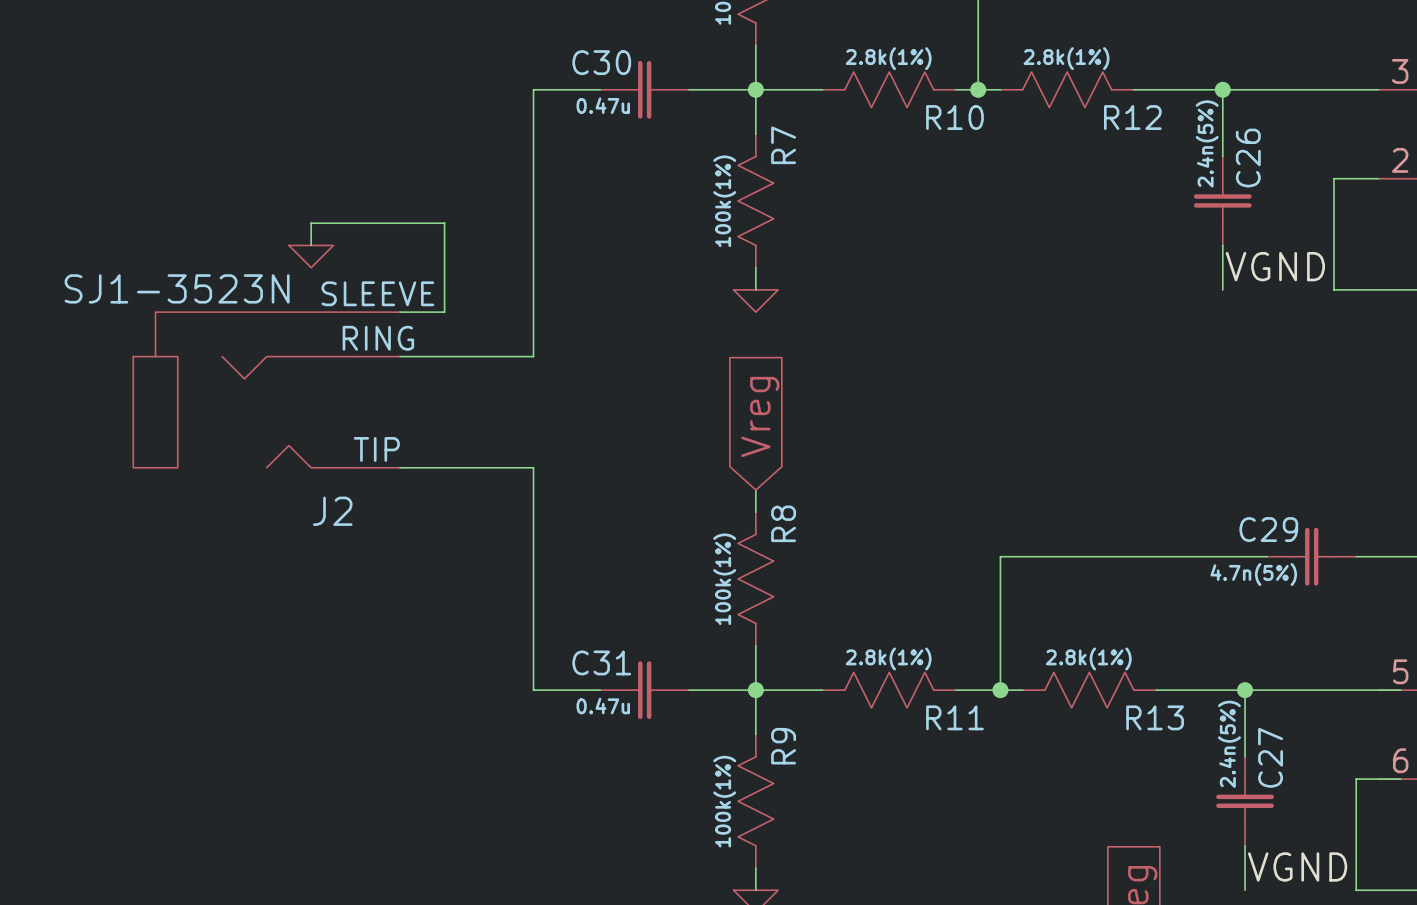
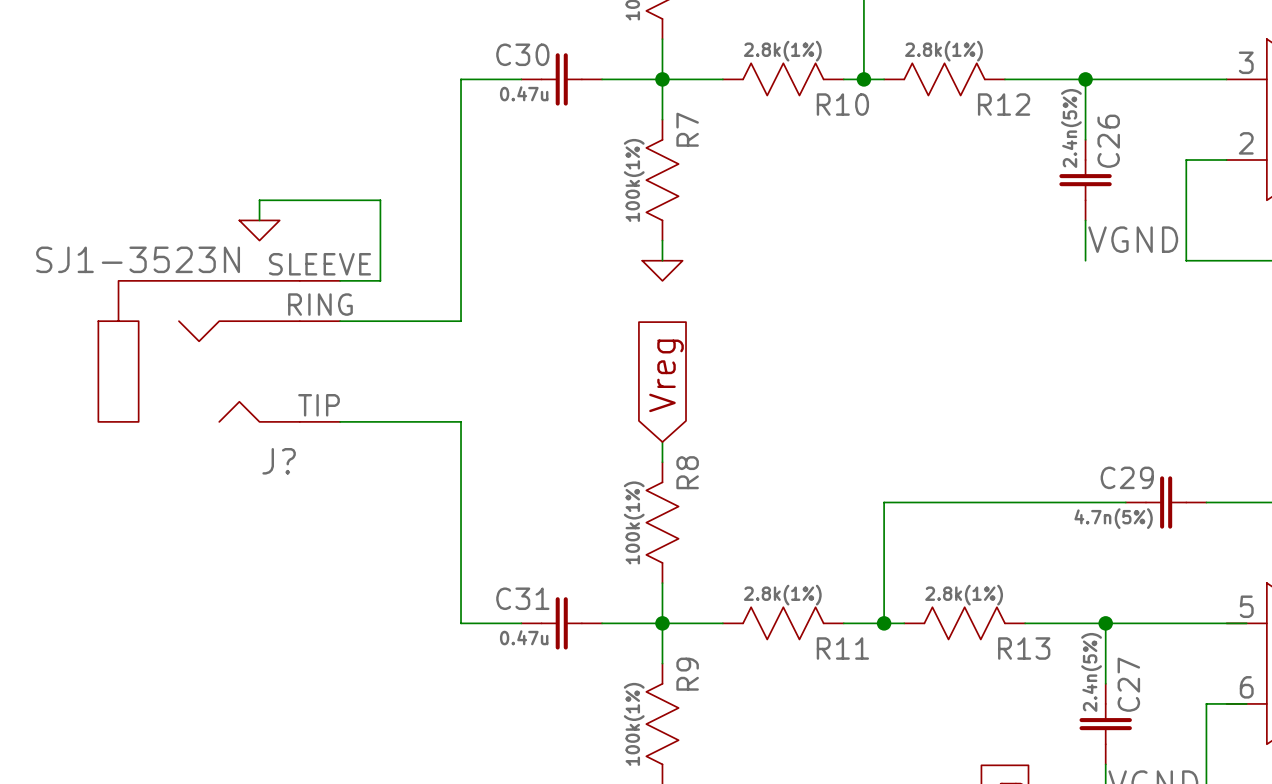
J2 name: J2 (332, 511) -> J? (279, 461)

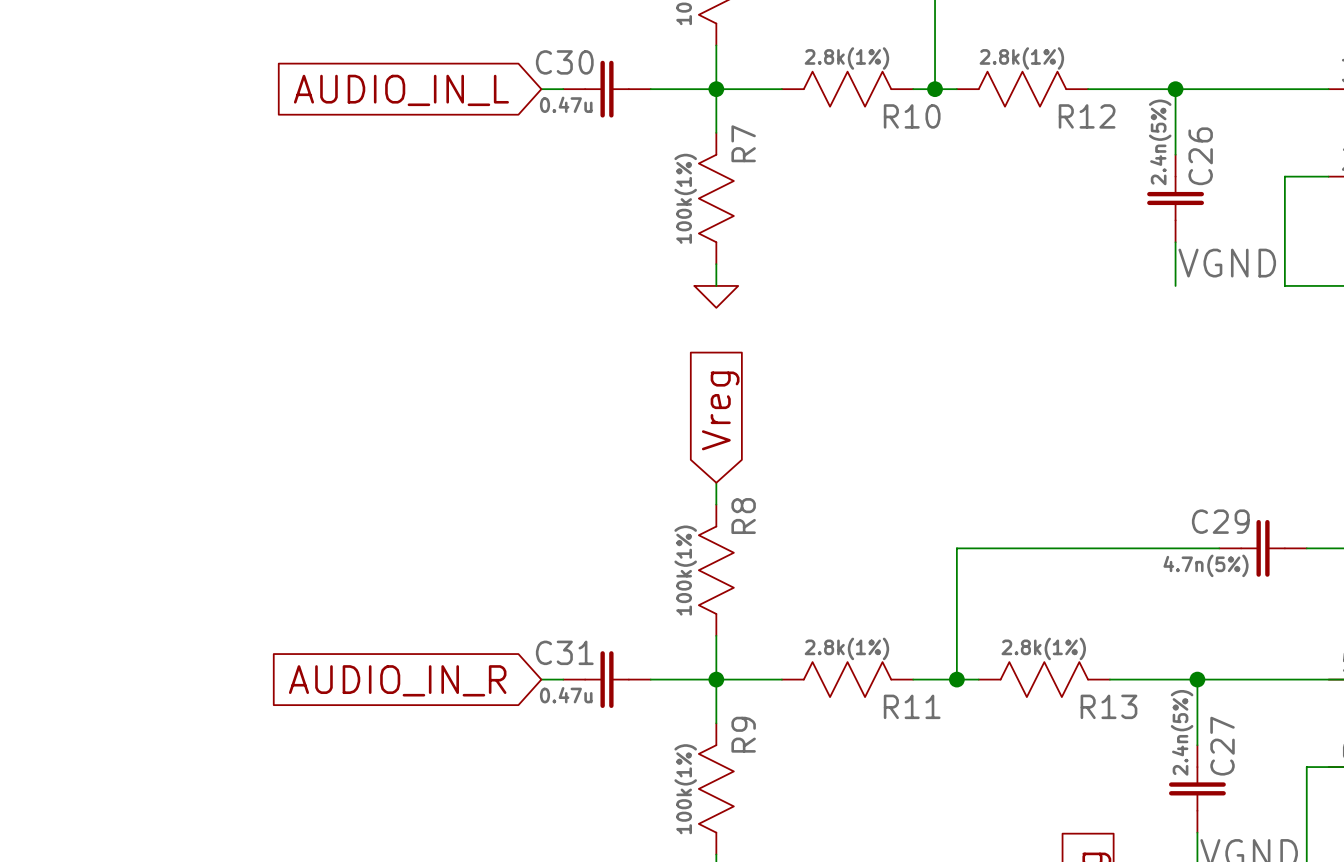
wire: (501, 79) (461, 79) (461, 321) (340, 321) -> none
global label: none -> AUDIO_IN_L (401, 90)
wire: (259, 220) (259, 200) (380, 200) (380, 280) (340, 280) -> none
power symbol: (259, 230) -> none
J?: SJ1-3523N (219, 351) -> none
wire: (340, 421) (461, 421) (461, 623) (501, 623) -> none
global label: none -> AUDIO_IN_R (397, 680)

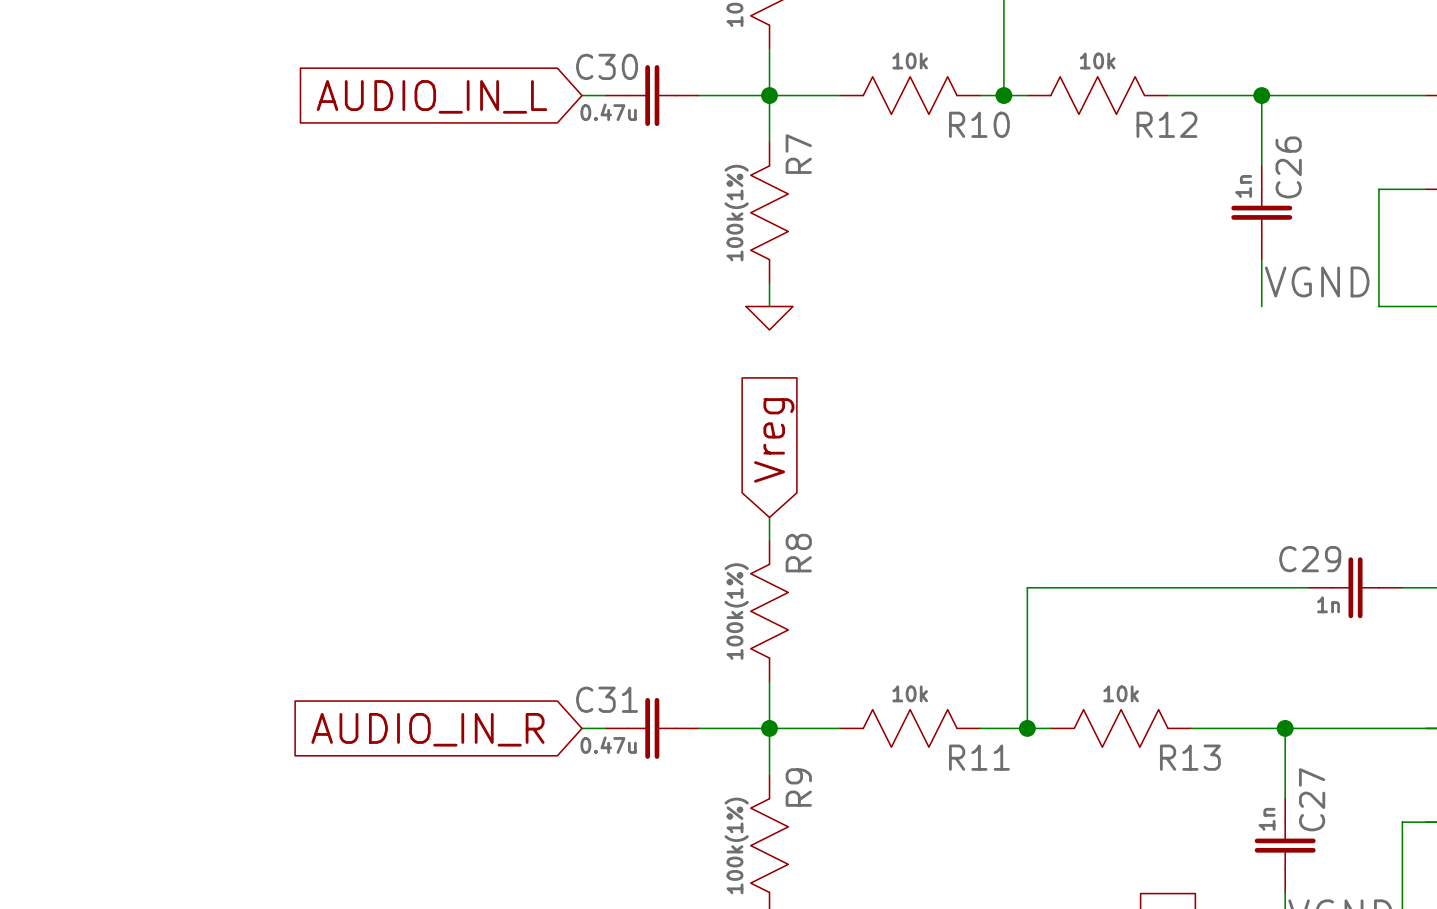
R10 value: 2.8k(1%) (846, 58) -> 10k (910, 61)
R12 value: 2.8k(1%) (1021, 58) -> 10k (1097, 61)
C26 value: 2.4n(5%) (1160, 142) -> 1n (1243, 186)
C29 value: 4.7n(5%) (1206, 565) -> 1n (1328, 604)
R11 value: 2.8k(1%) (846, 648) -> 10k (910, 693)
R13 value: 2.8k(1%) (1043, 648) -> 10k (1121, 693)
C27 value: 2.4n(5%) (1182, 732) -> 1n (1267, 819)

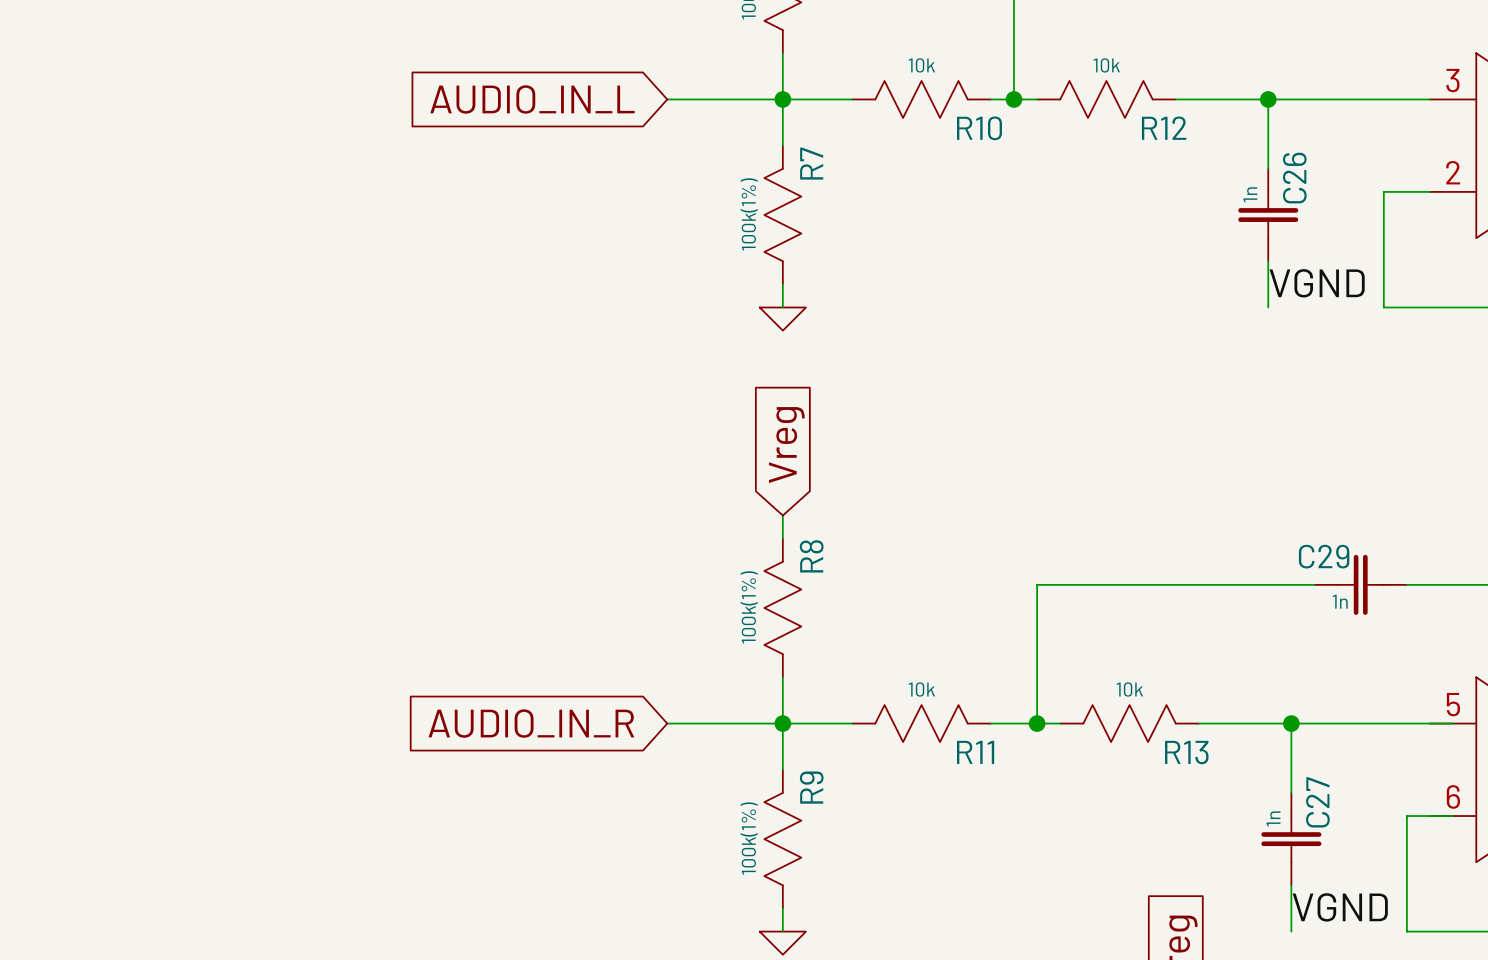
wire: (582, 95) (605, 95) -> none
C30: 0.47u (652, 95) -> none
global label position: AUDIO_IN_L (431, 96) -> AUDIO_IN_L (532, 99)
wire: (582, 728) (605, 728) -> none
C31: 0.47u (652, 728) -> none
global label position: AUDIO_IN_R (427, 729) -> AUDIO_IN_R (531, 723)

